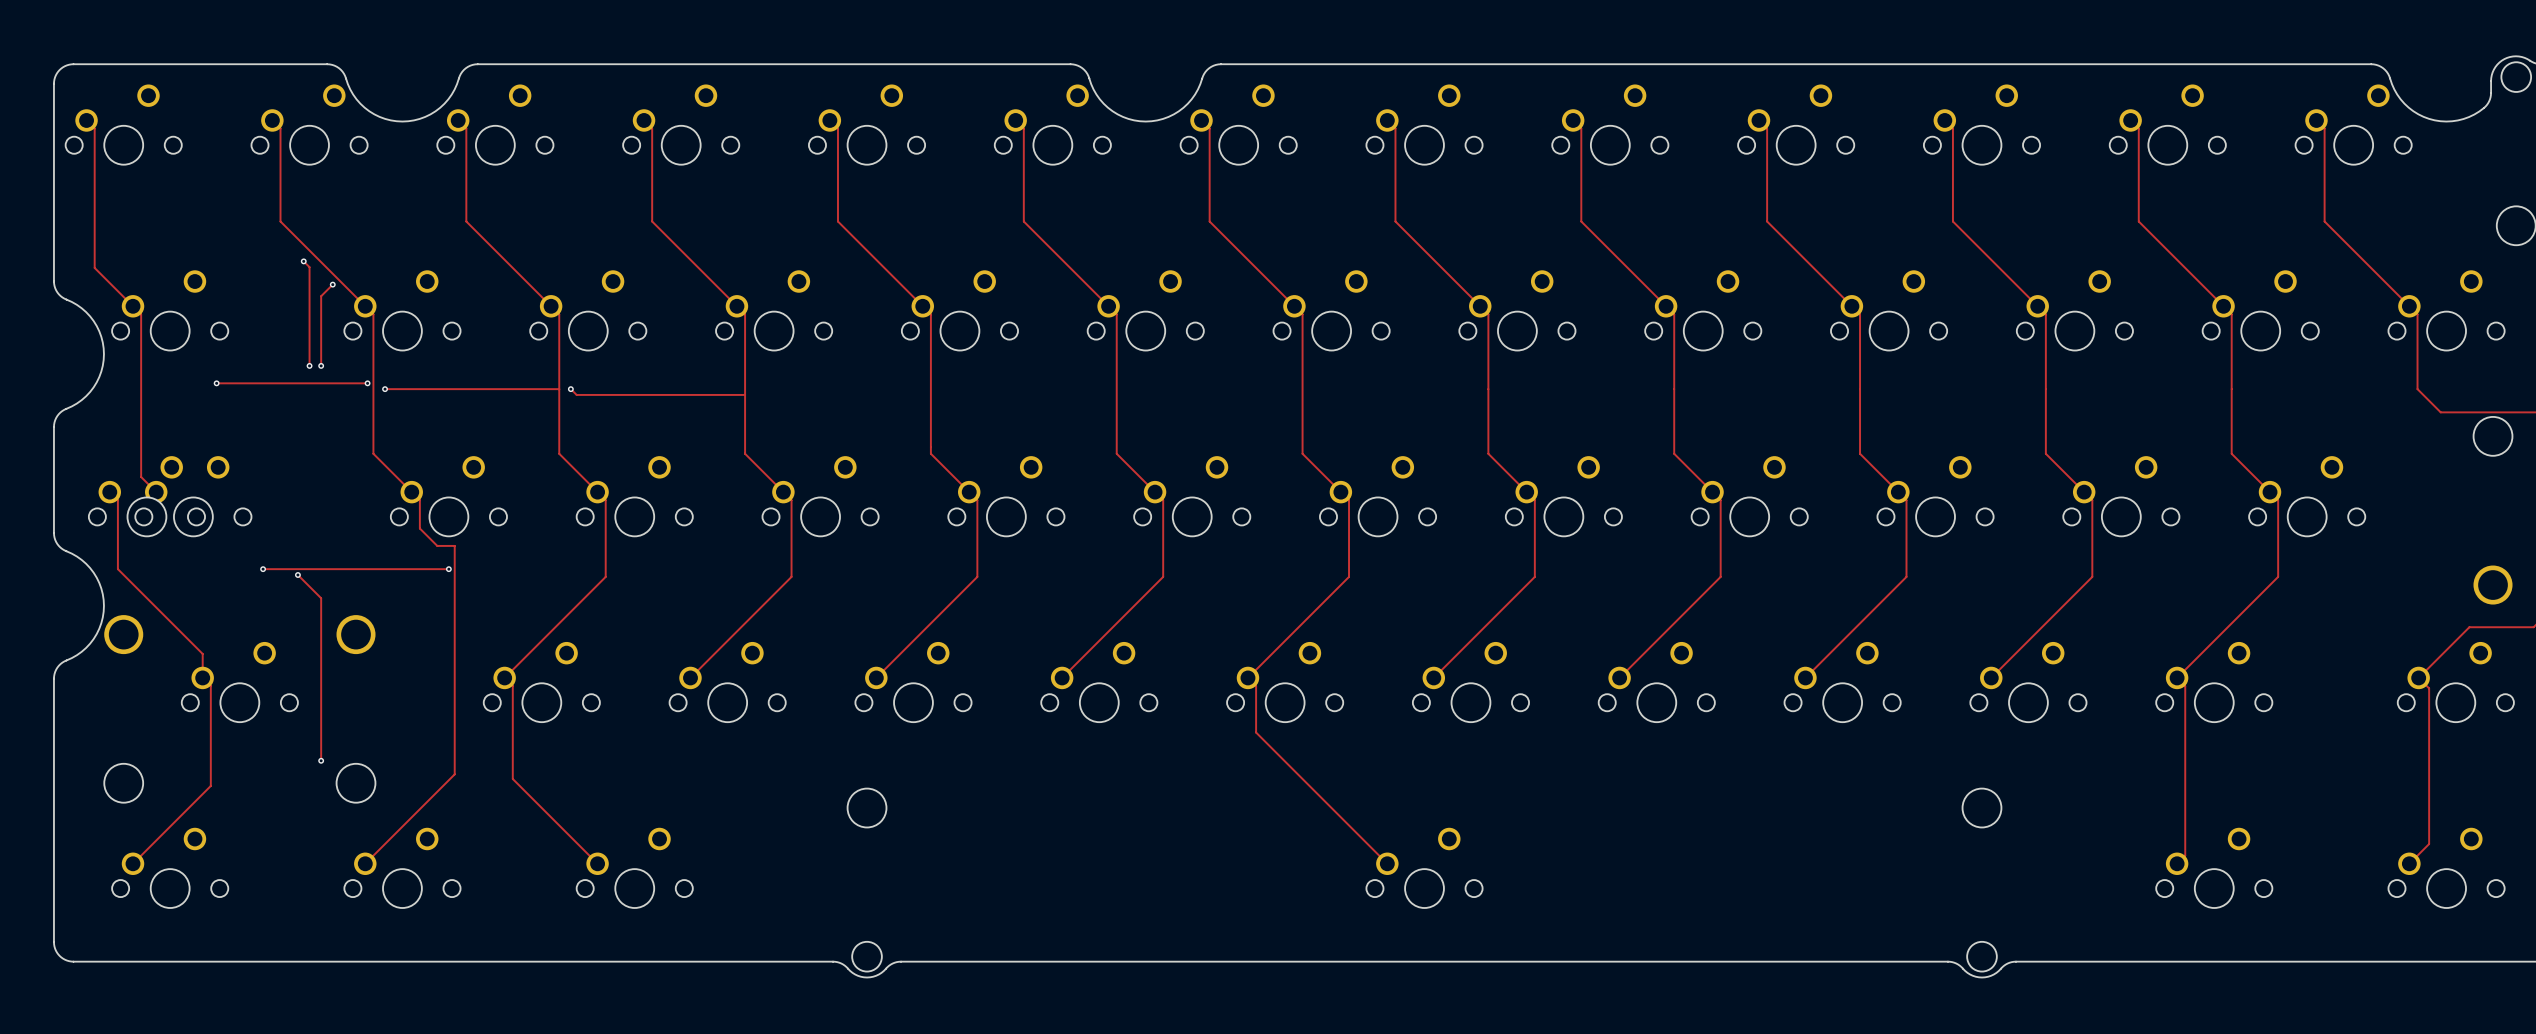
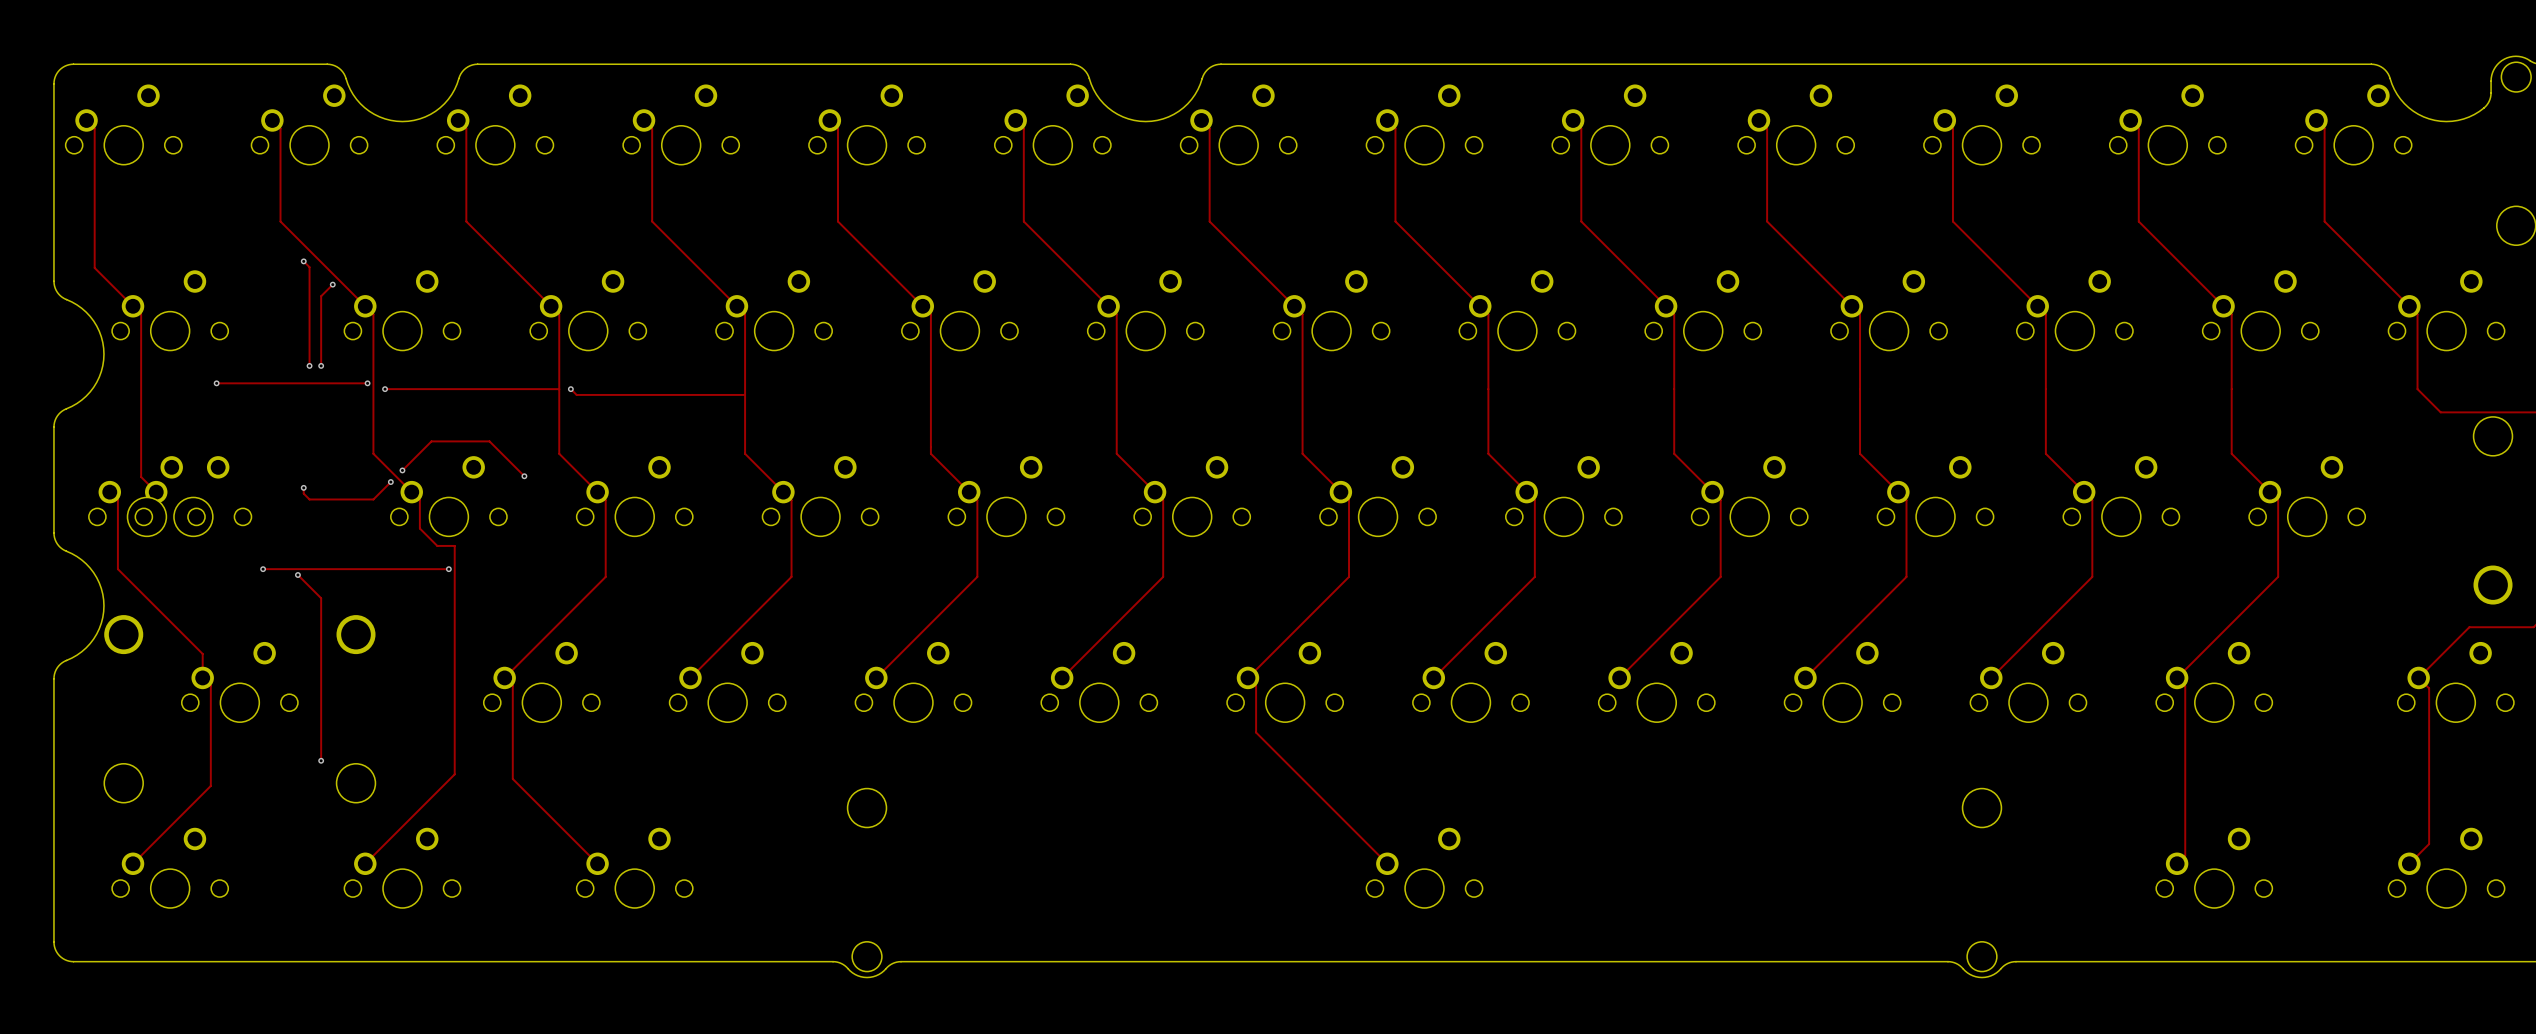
track: none -> (402, 470) (431, 441) (489, 441) (524, 476)
via: none -> (402, 470)
via: none -> (524, 476)
track: none -> (390, 482) (373, 499) (309, 499) (303, 493) (303, 487)
via: none -> (390, 482)
via: none -> (303, 487)

